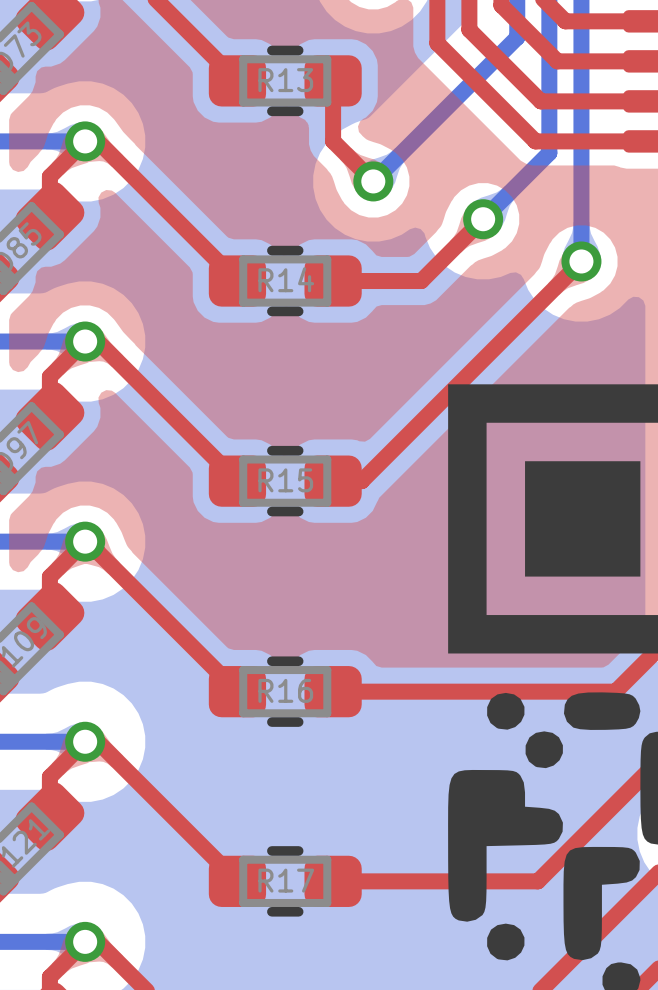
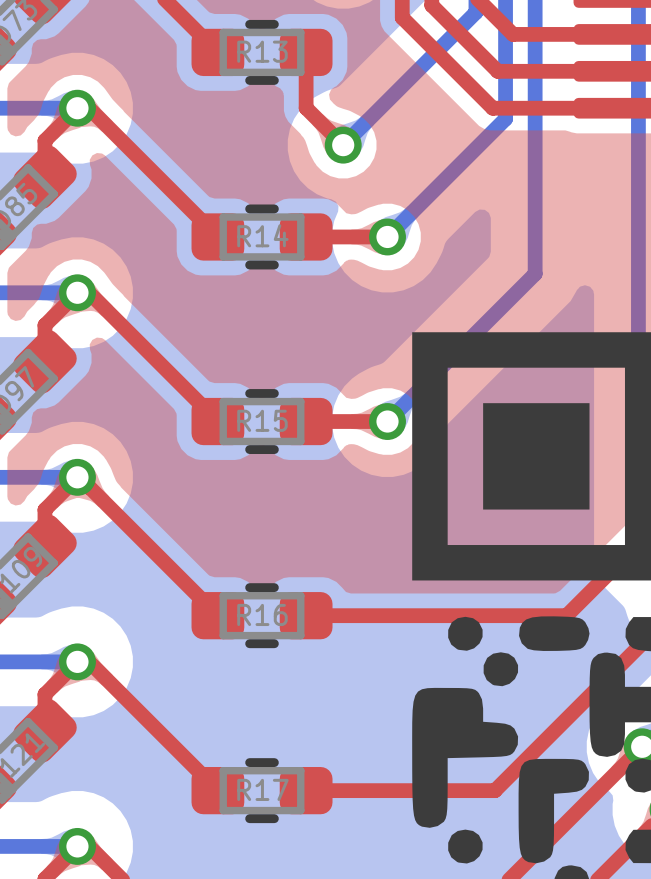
top track: (483, 219) (421, 281) -> none
bottom track: none -> (444, 179) (387, 236)
via: (483, 219) -> none
top track: (581, 261) (361, 481) -> (387, 421) (332, 421)
bottom track: none -> (535, 218) (535, 273) (387, 421)
via: (581, 261) -> none
via: none -> (387, 236)
via: none -> (387, 421)

